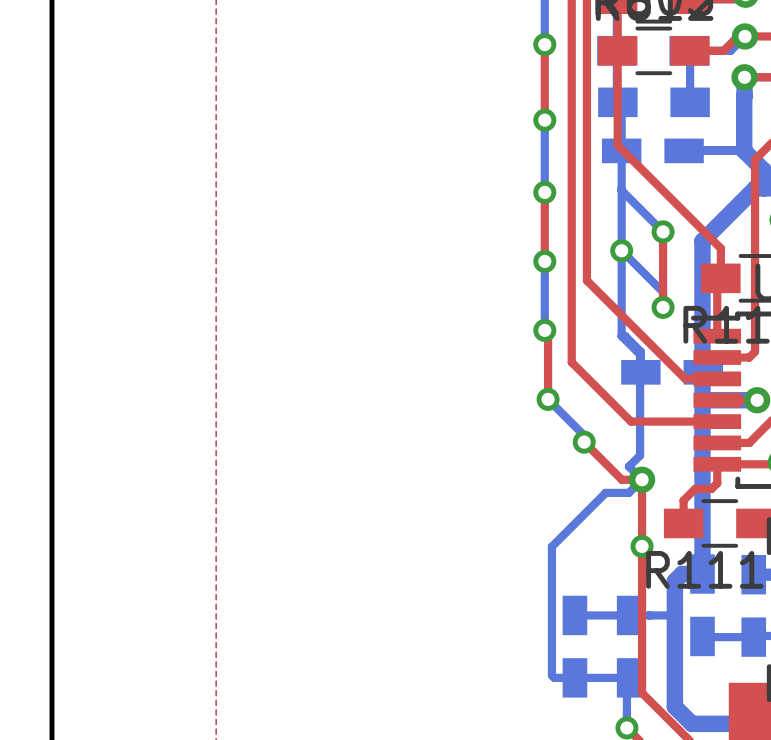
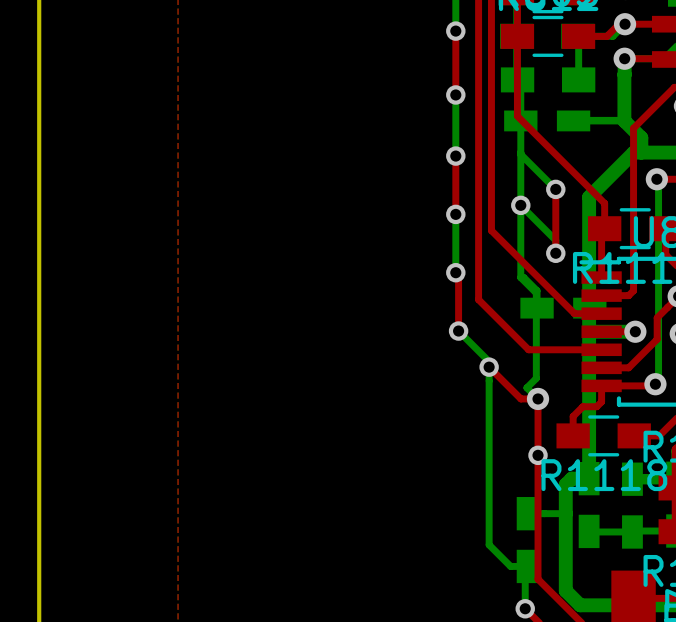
bottom track: (642, 479) (628, 492) (605, 492) (551, 546) (551, 675) (554, 677) (609, 677) -> (489, 367) (489, 544) (510, 566)
bottom track: (574, 615) (629, 615) -> none
part: (574, 646) -> none

